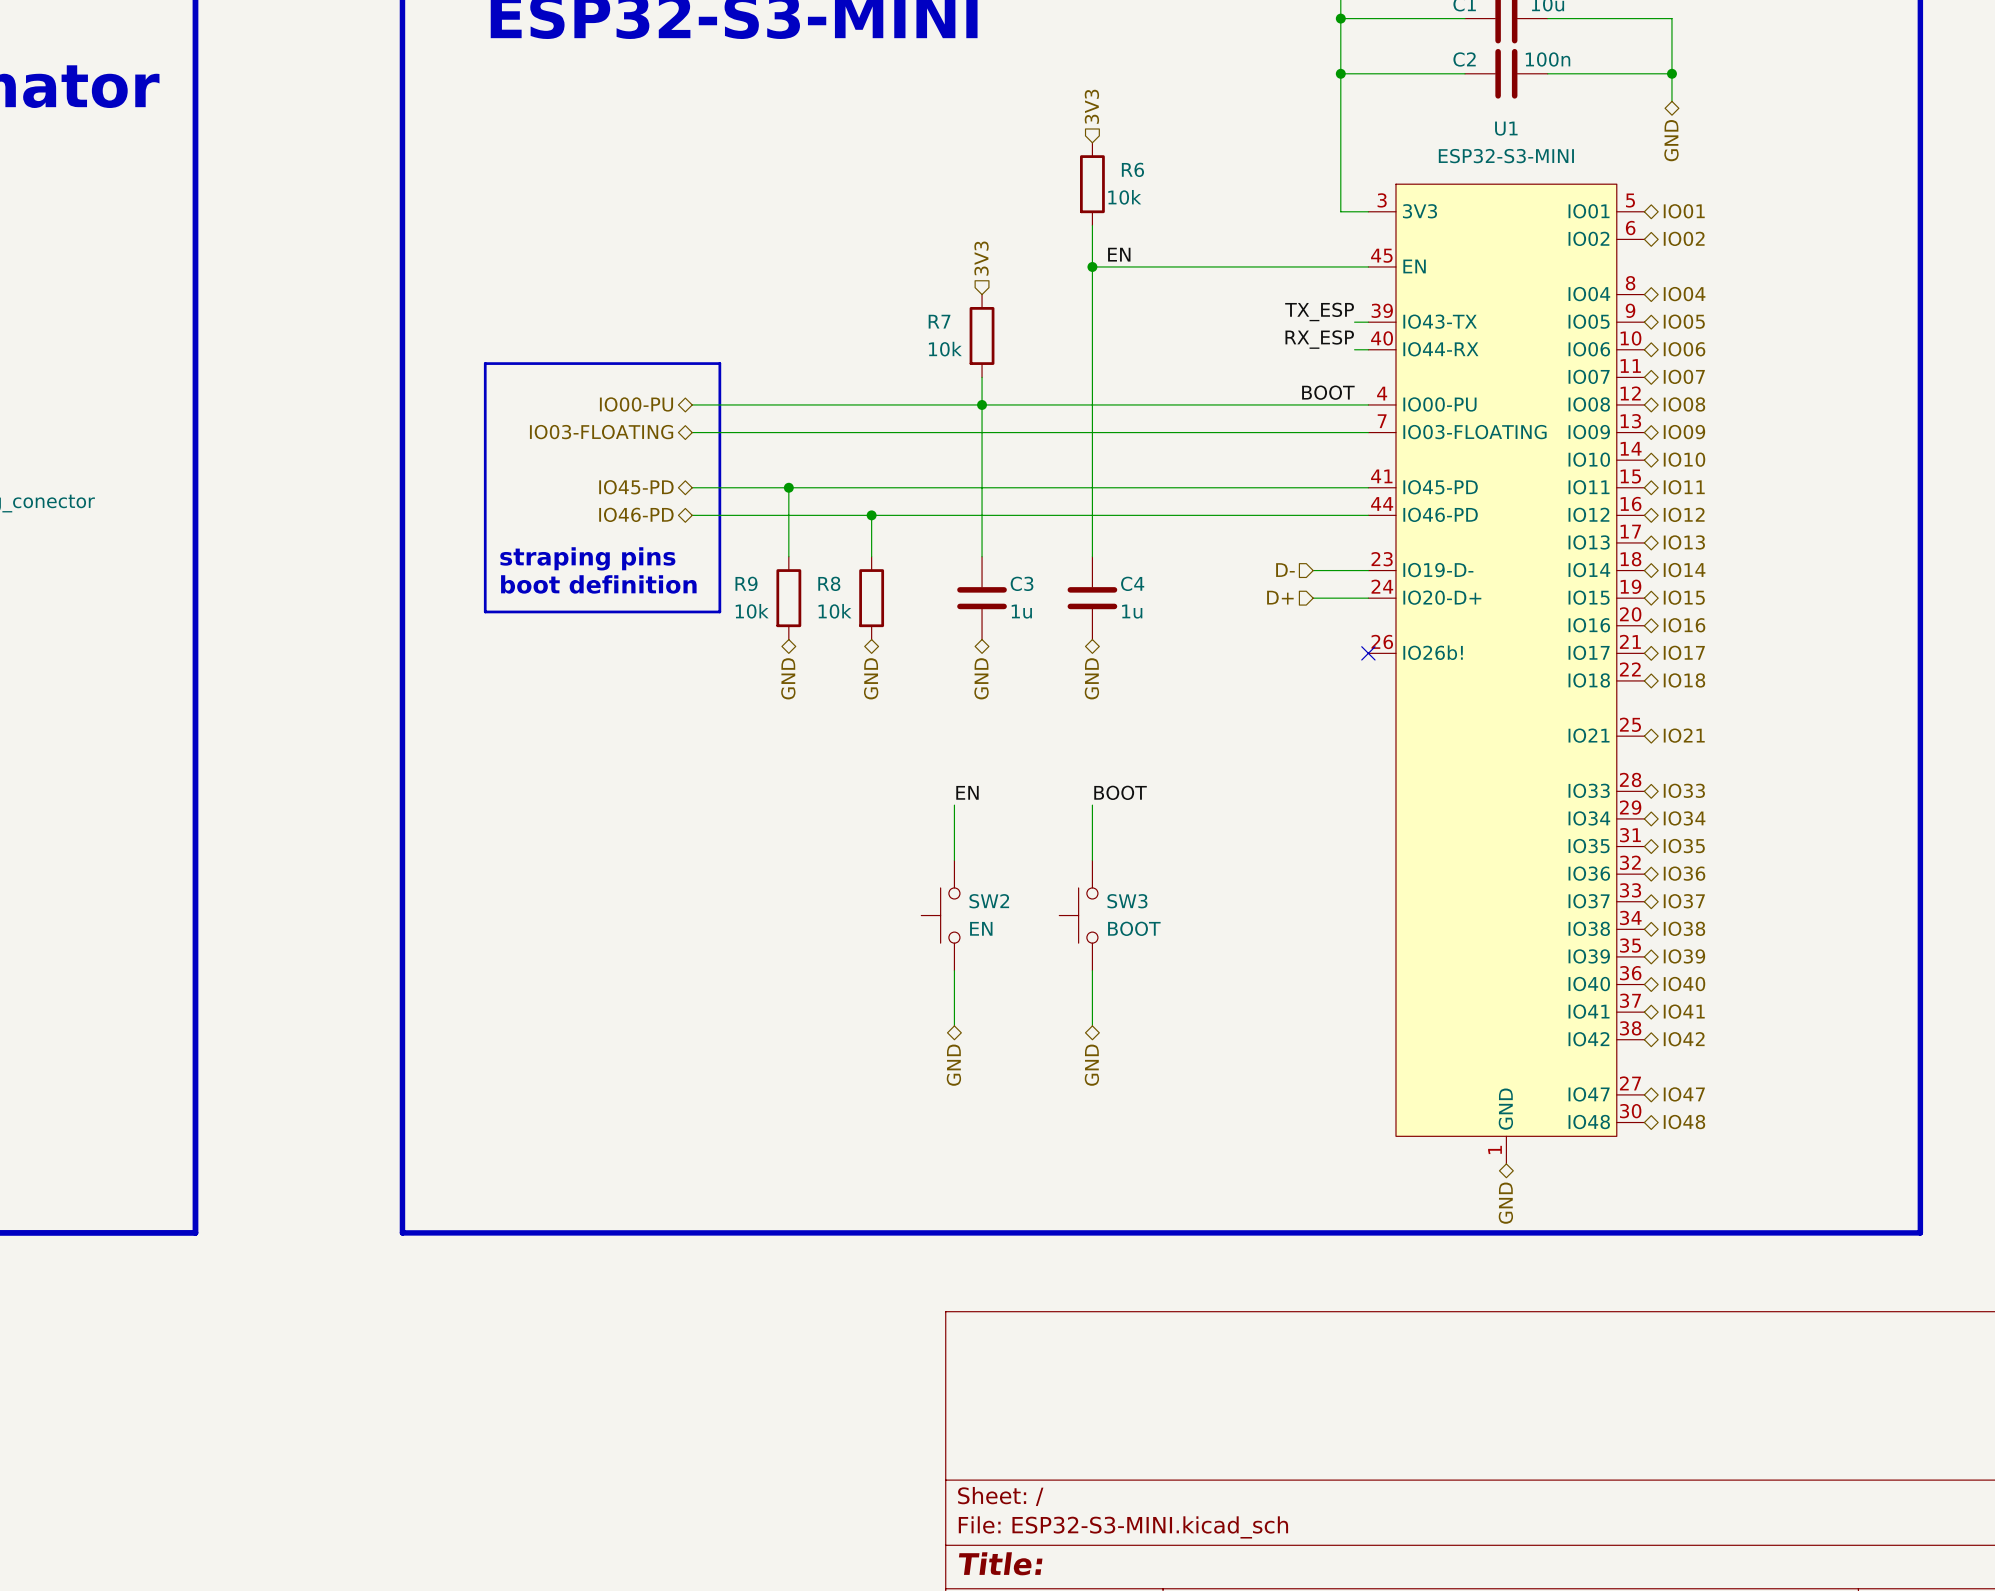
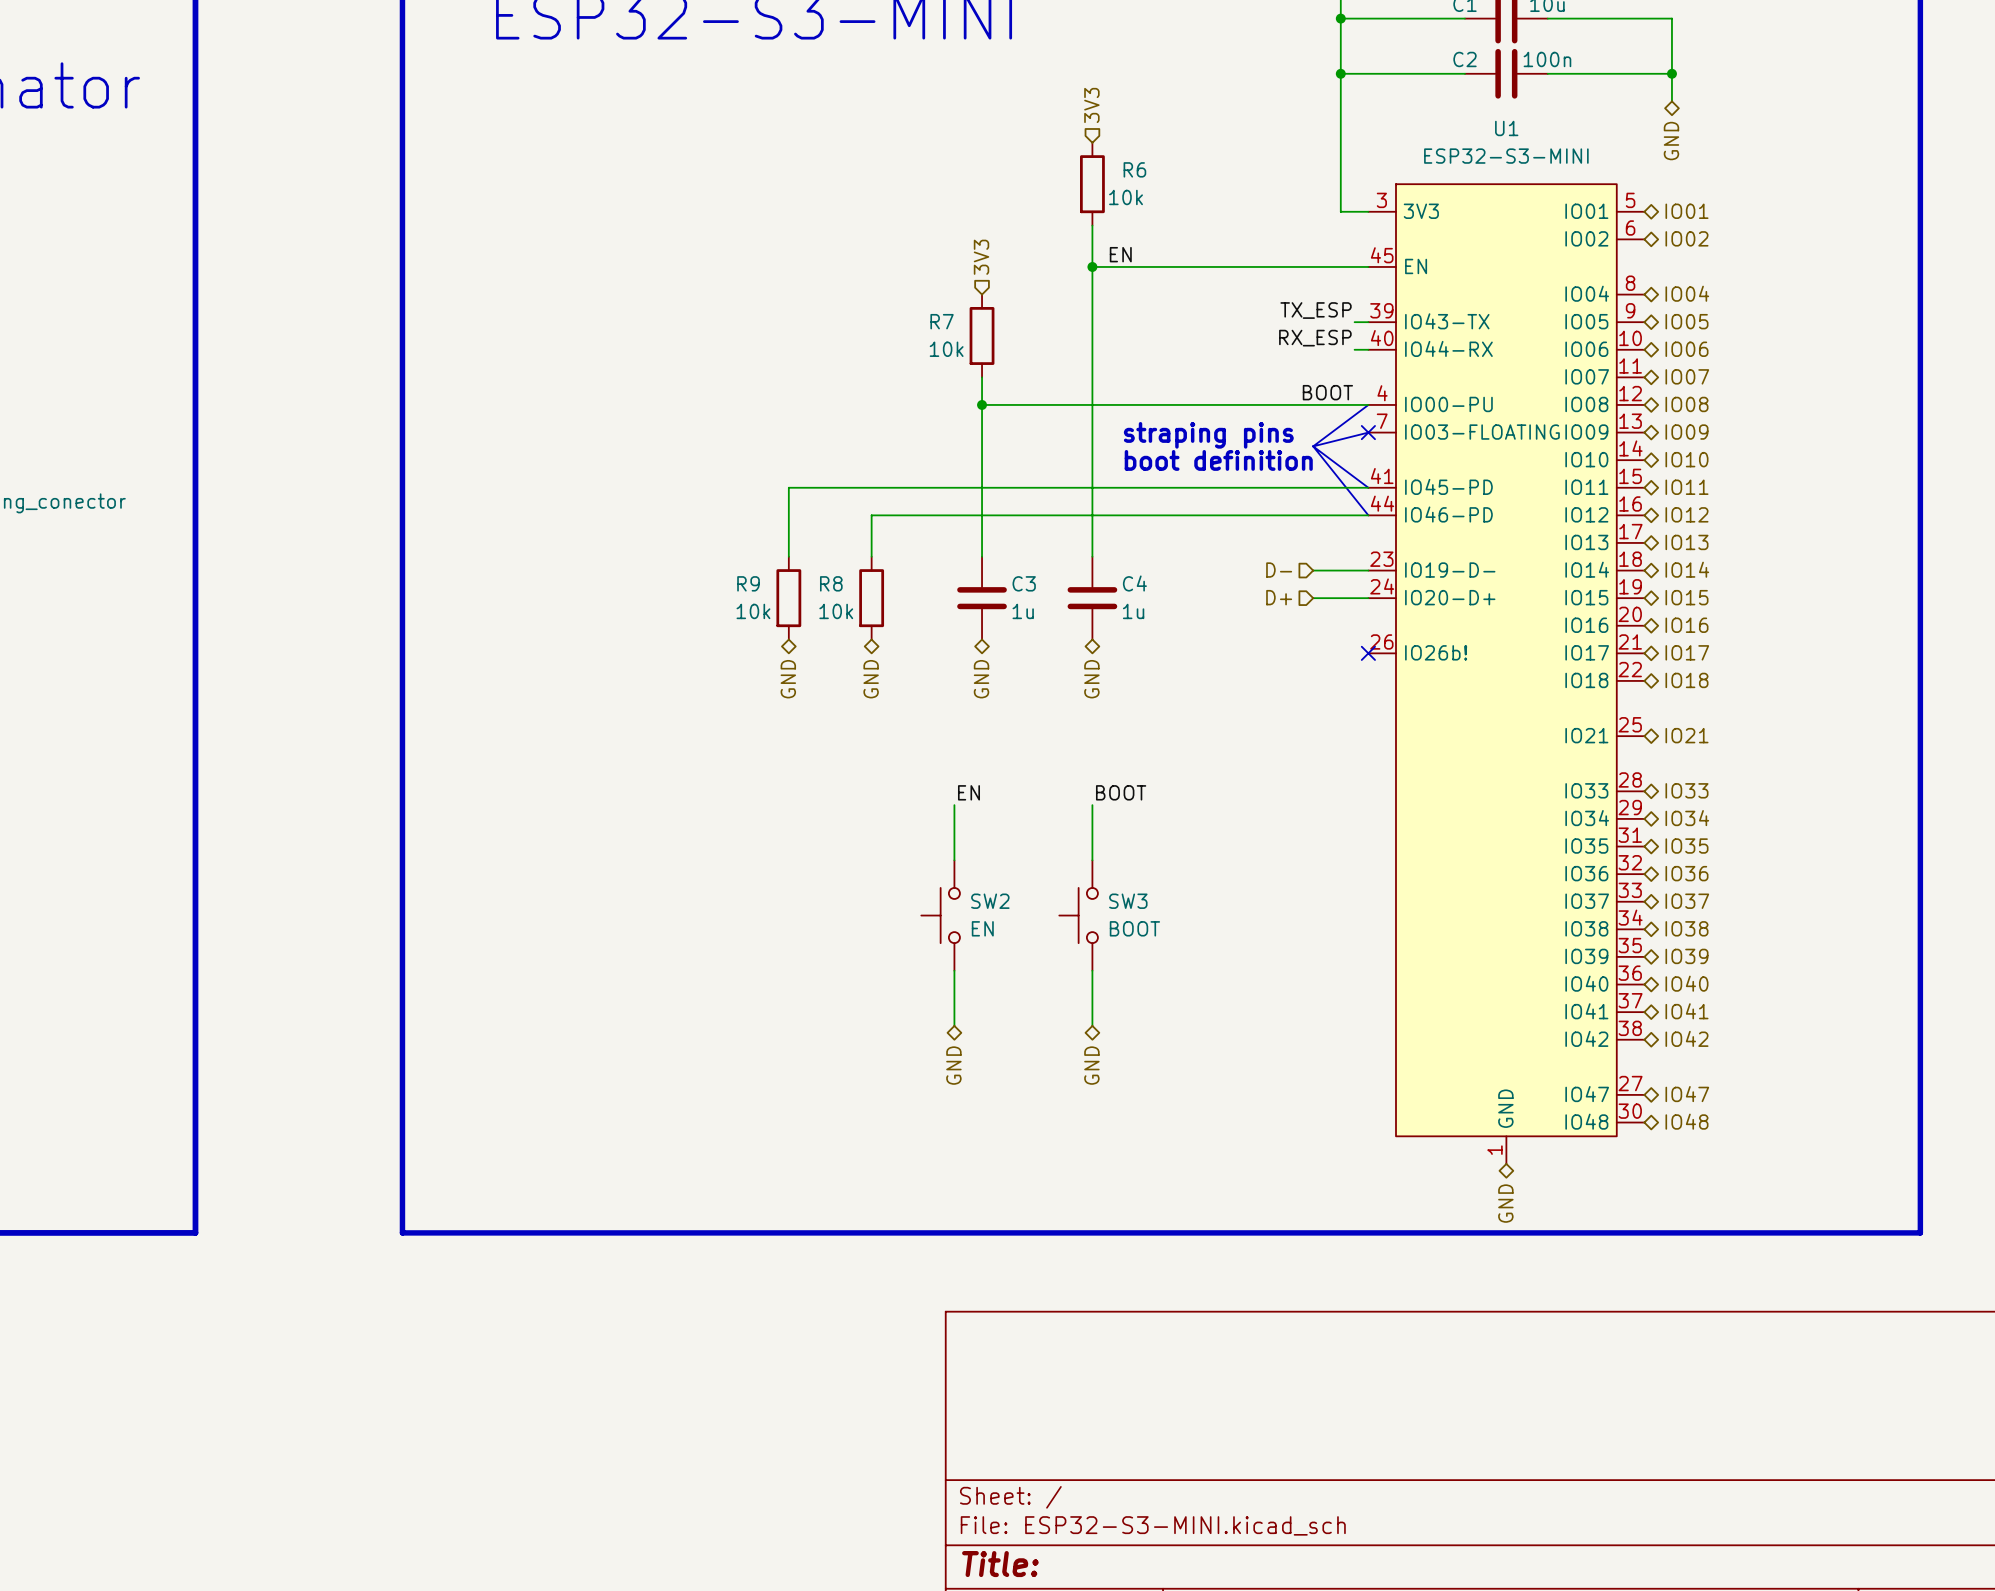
line: (485, 363) (719, 363) (719, 611) (485, 611) (485, 363) -> none
hierarchical label: IO00-PU (636, 404) -> none
wire: (692, 404) (982, 404) -> none
line: none -> (1368, 404) (1313, 446)
hierarchical label: IO03-FLOATING (601, 432) -> none
wire: (692, 432) (1368, 432) -> none
line: none -> (1368, 432) (1313, 446)
no-connect mark: none -> (1368, 432)
text: none -> straping pins (1208, 435)
line: none -> (1313, 446) (1368, 487)
line: none -> (1313, 446) (1368, 515)
text: none -> boot definition (1218, 460)
hierarchical label: IO45-PD (636, 487) -> none
wire: (692, 487) (788, 487) -> none
junction: (788, 487) -> none
hierarchical label: IO46-PD (636, 514) -> none
wire: (692, 515) (871, 515) -> none
junction: (871, 515) -> none
text: straping pins (587, 558) -> none
text: boot definition (598, 584) -> none

